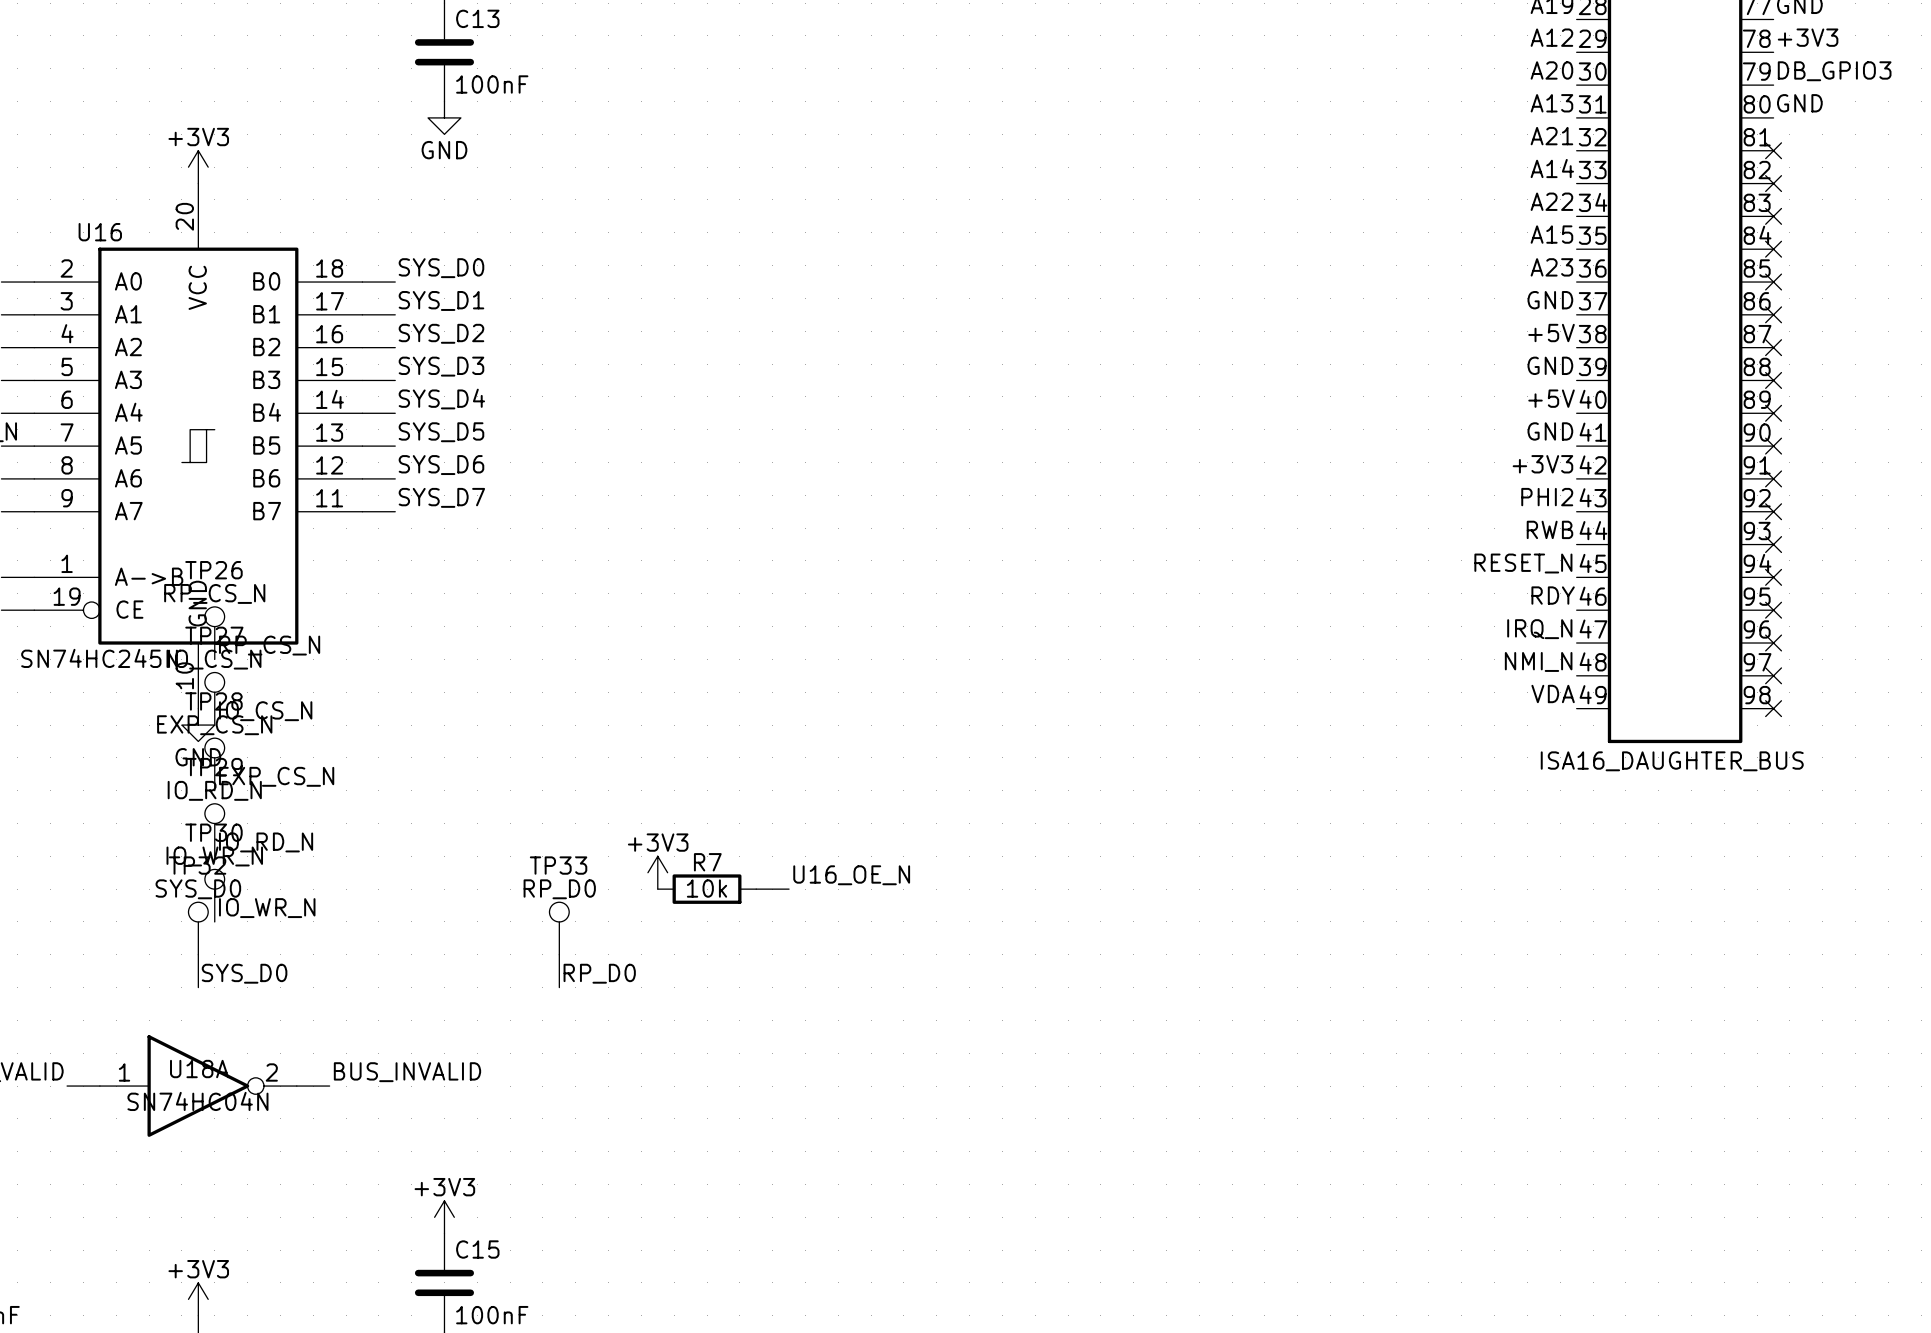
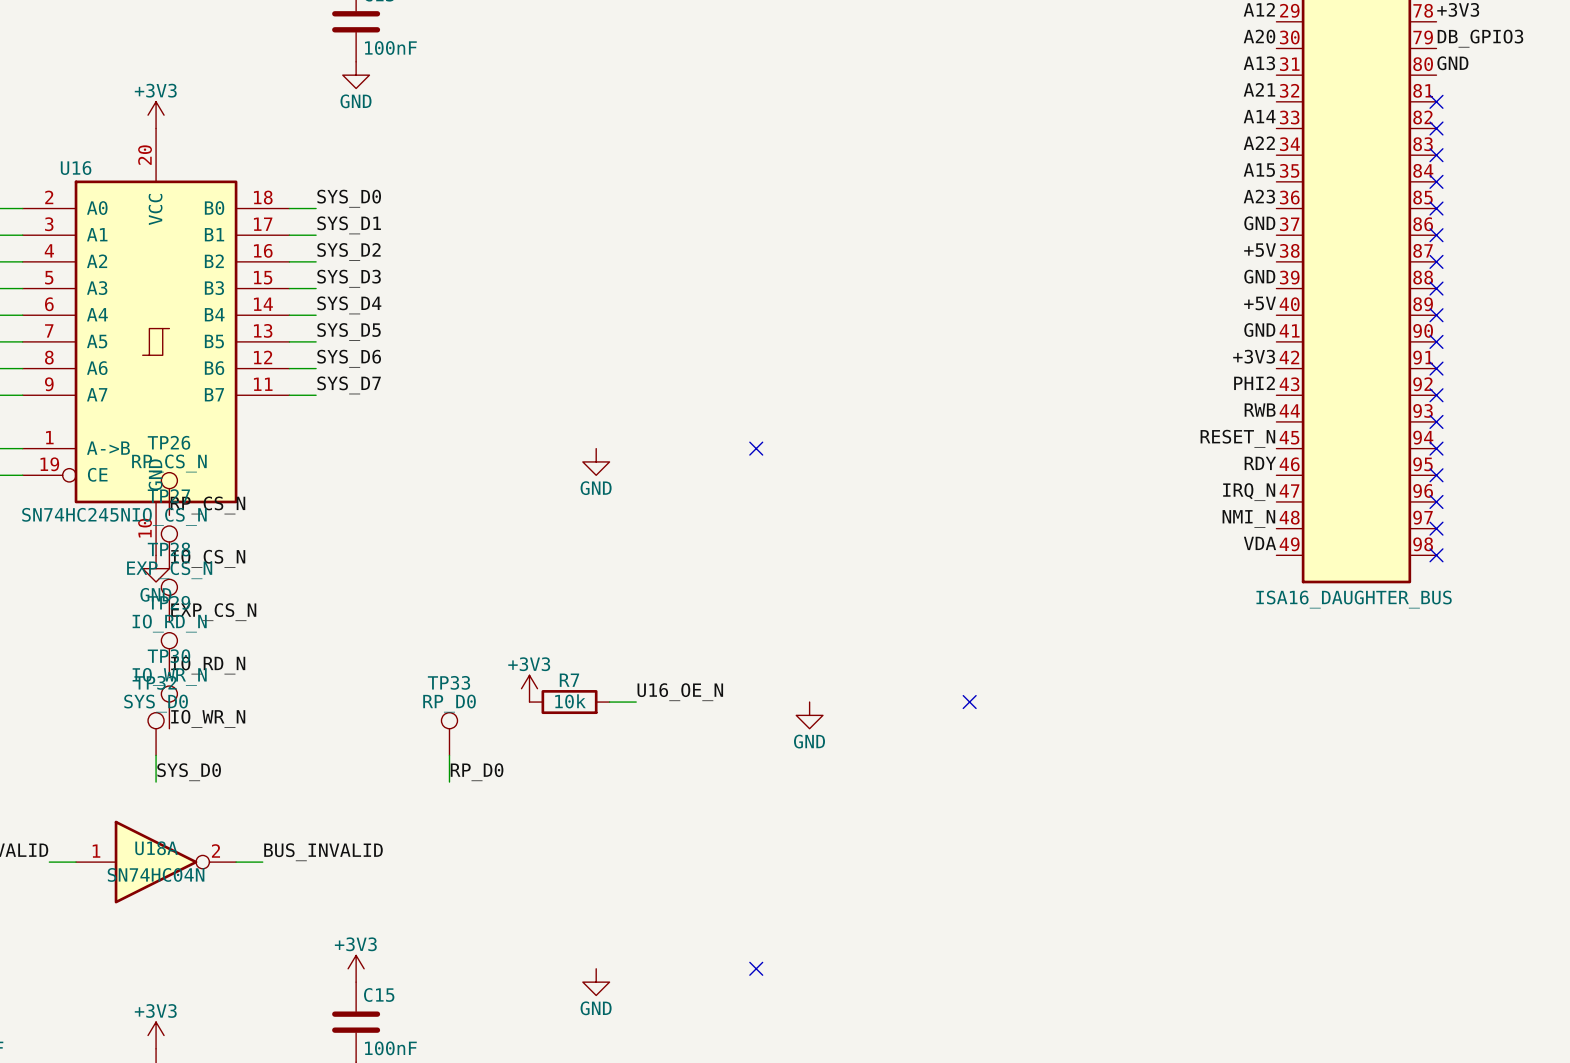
no-connect mark: none -> (756, 448)
power symbol: none -> GND (596, 461)
no-connect mark: none -> (969, 702)
power symbol: none -> GND (809, 715)
no-connect mark: none -> (756, 968)
power symbol: none -> GND (596, 982)

